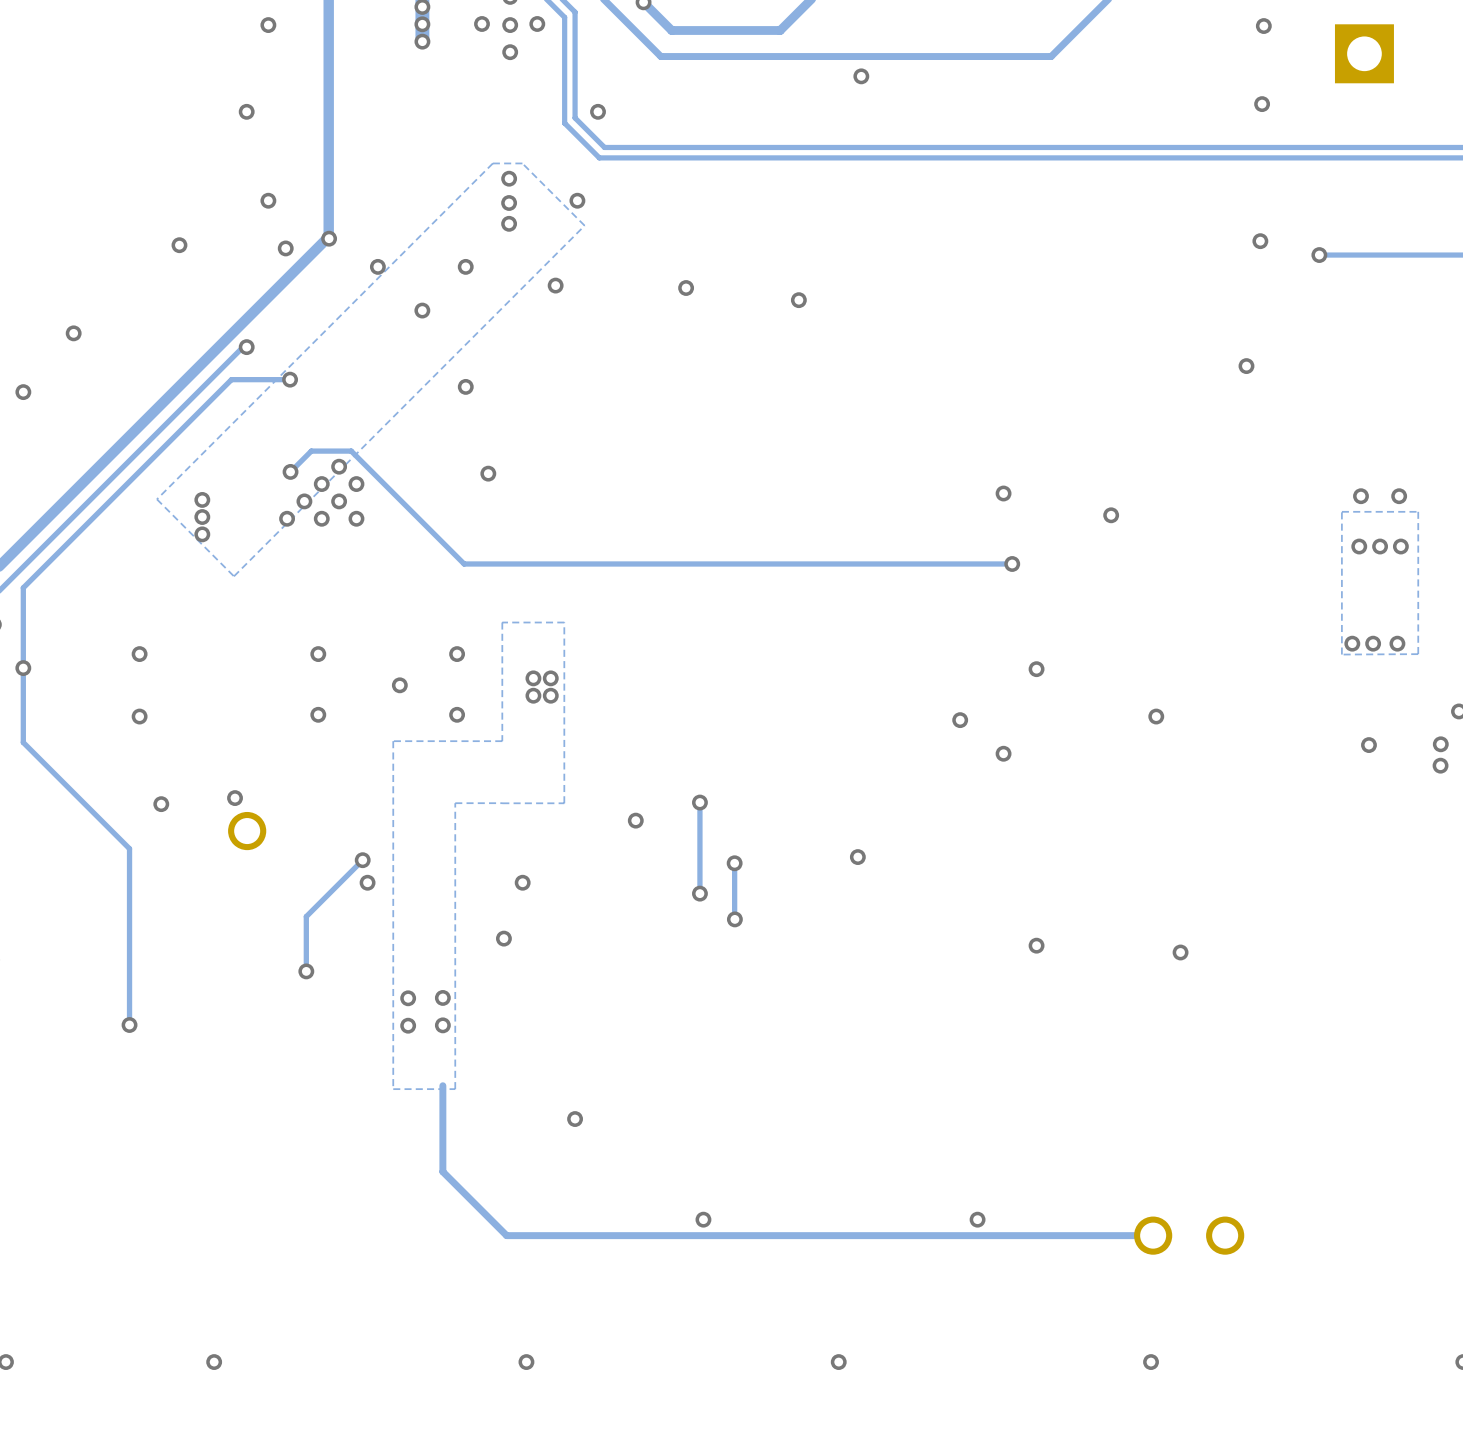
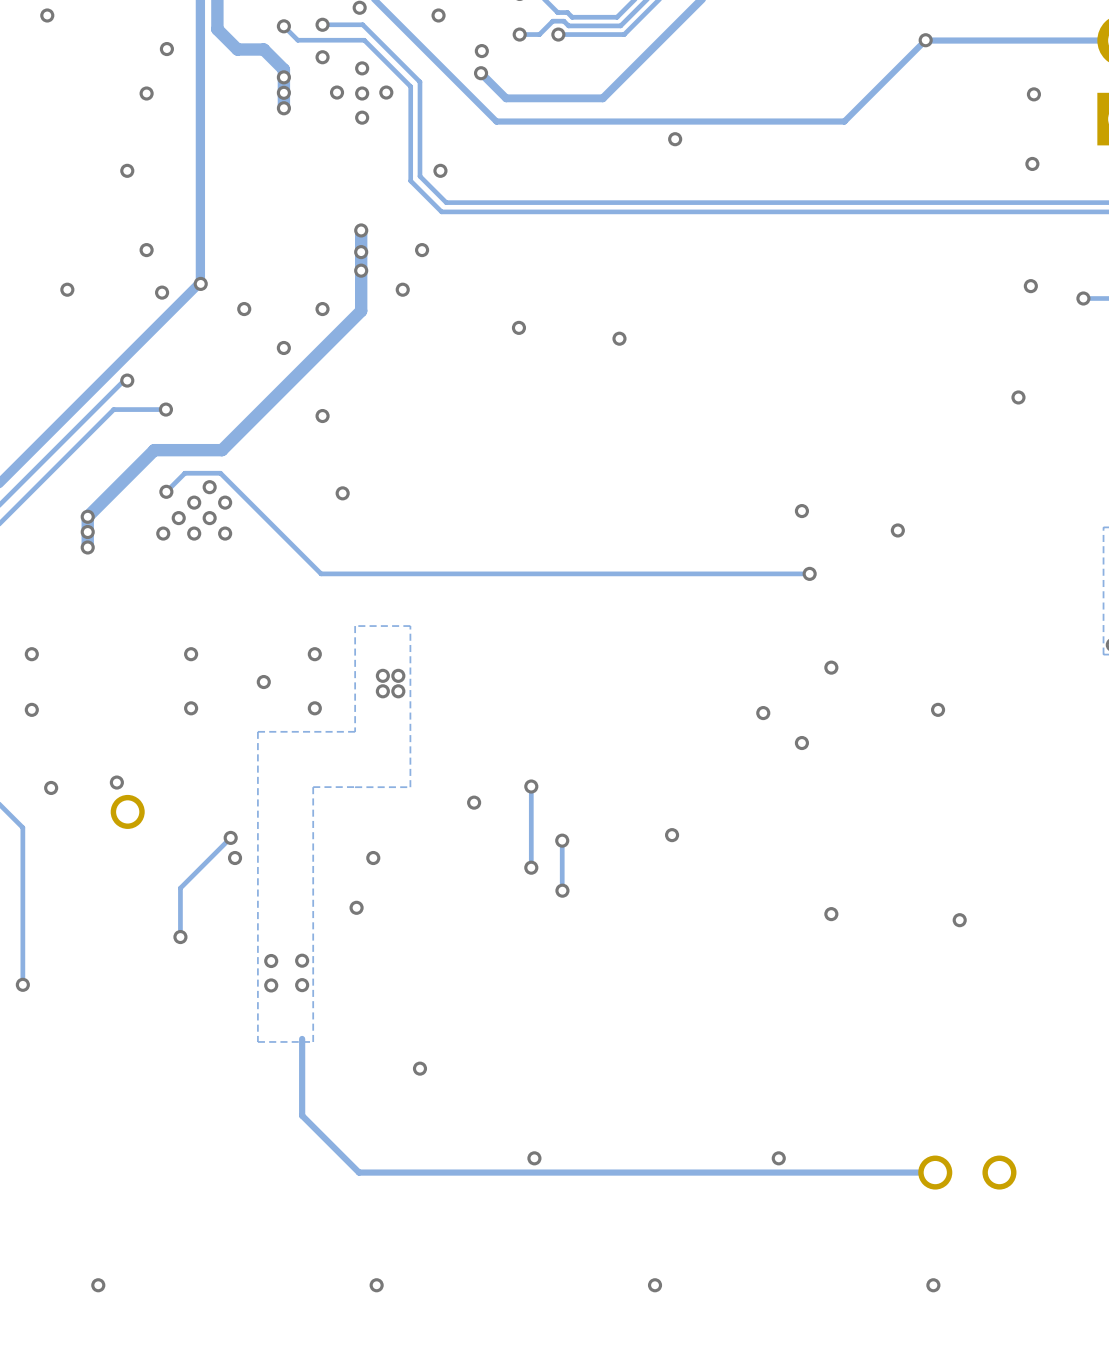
zone outline: (522, 163) (584, 225) (233, 576) (156, 499) (492, 163) (522, 163) -> none
track: none -> (361, 230) (361, 310) (222, 450) (154, 450) (87, 516) (87, 547)
via position: (555, 285) -> (402, 289)

